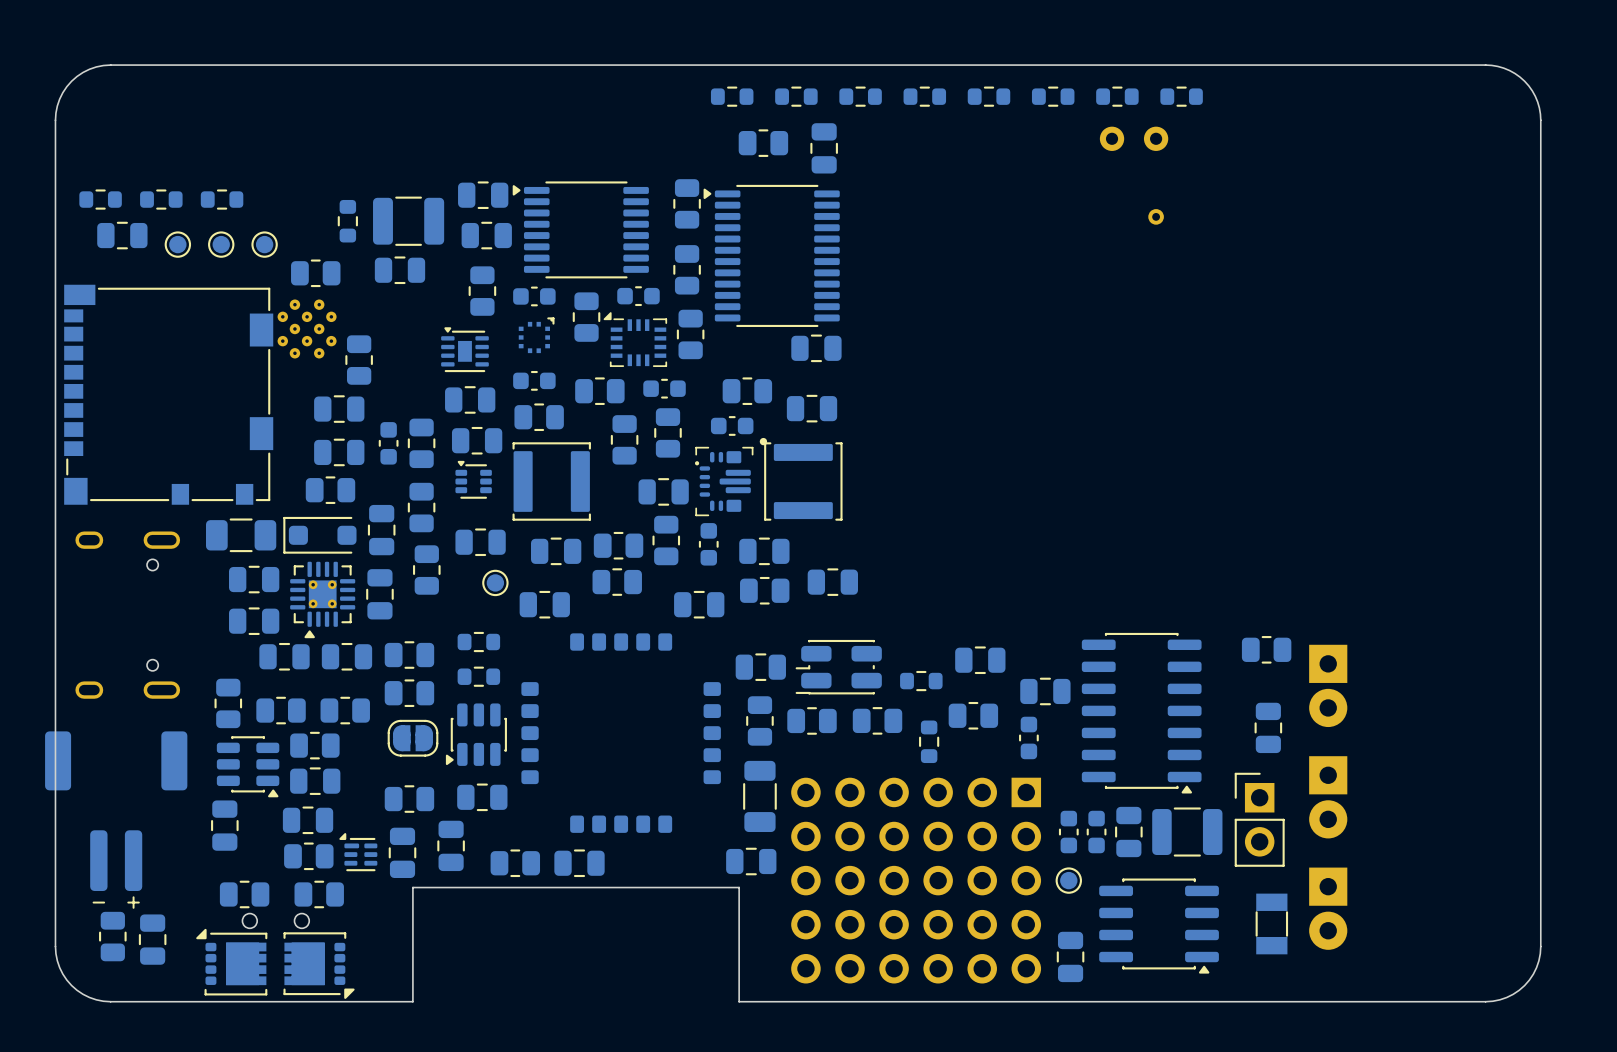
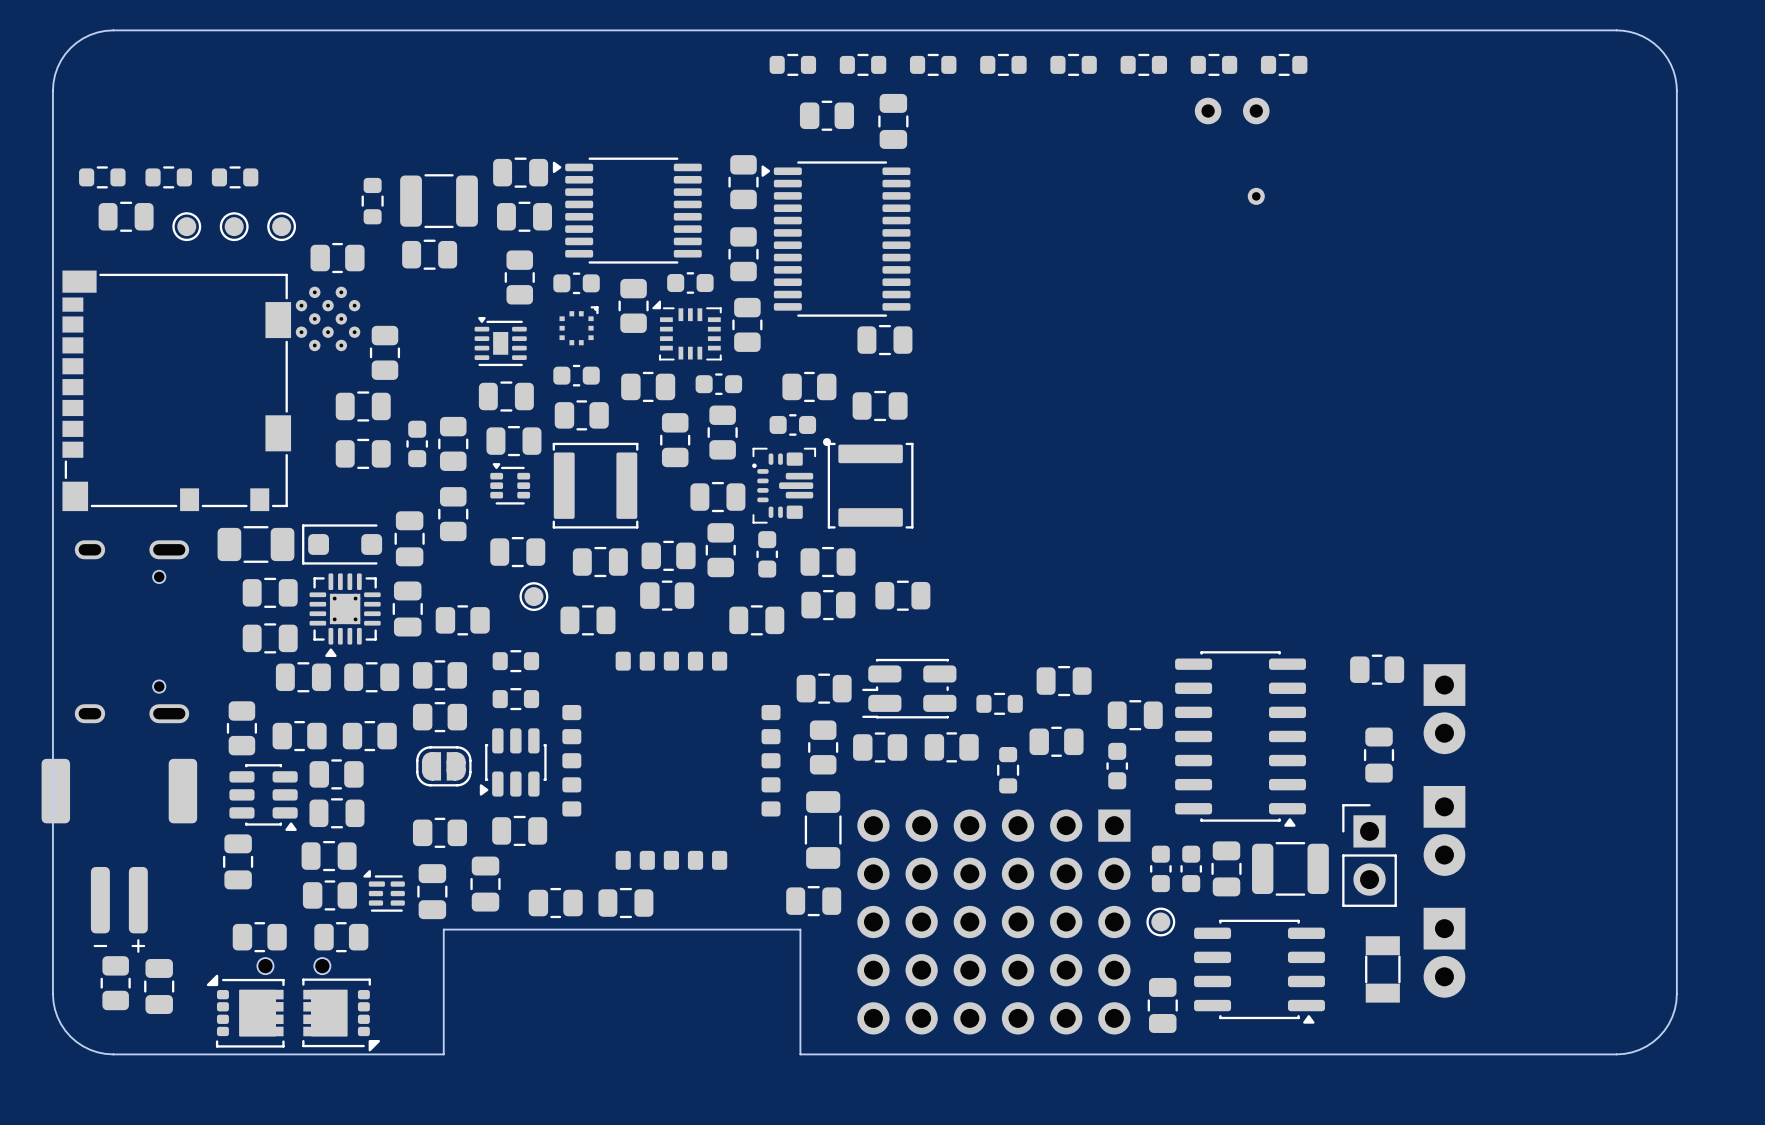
part: (330, 490) -> none
part rotation: 0° (426, 570) -> 90° clockwise (462, 620)
part position: (426, 570) -> (462, 620)

